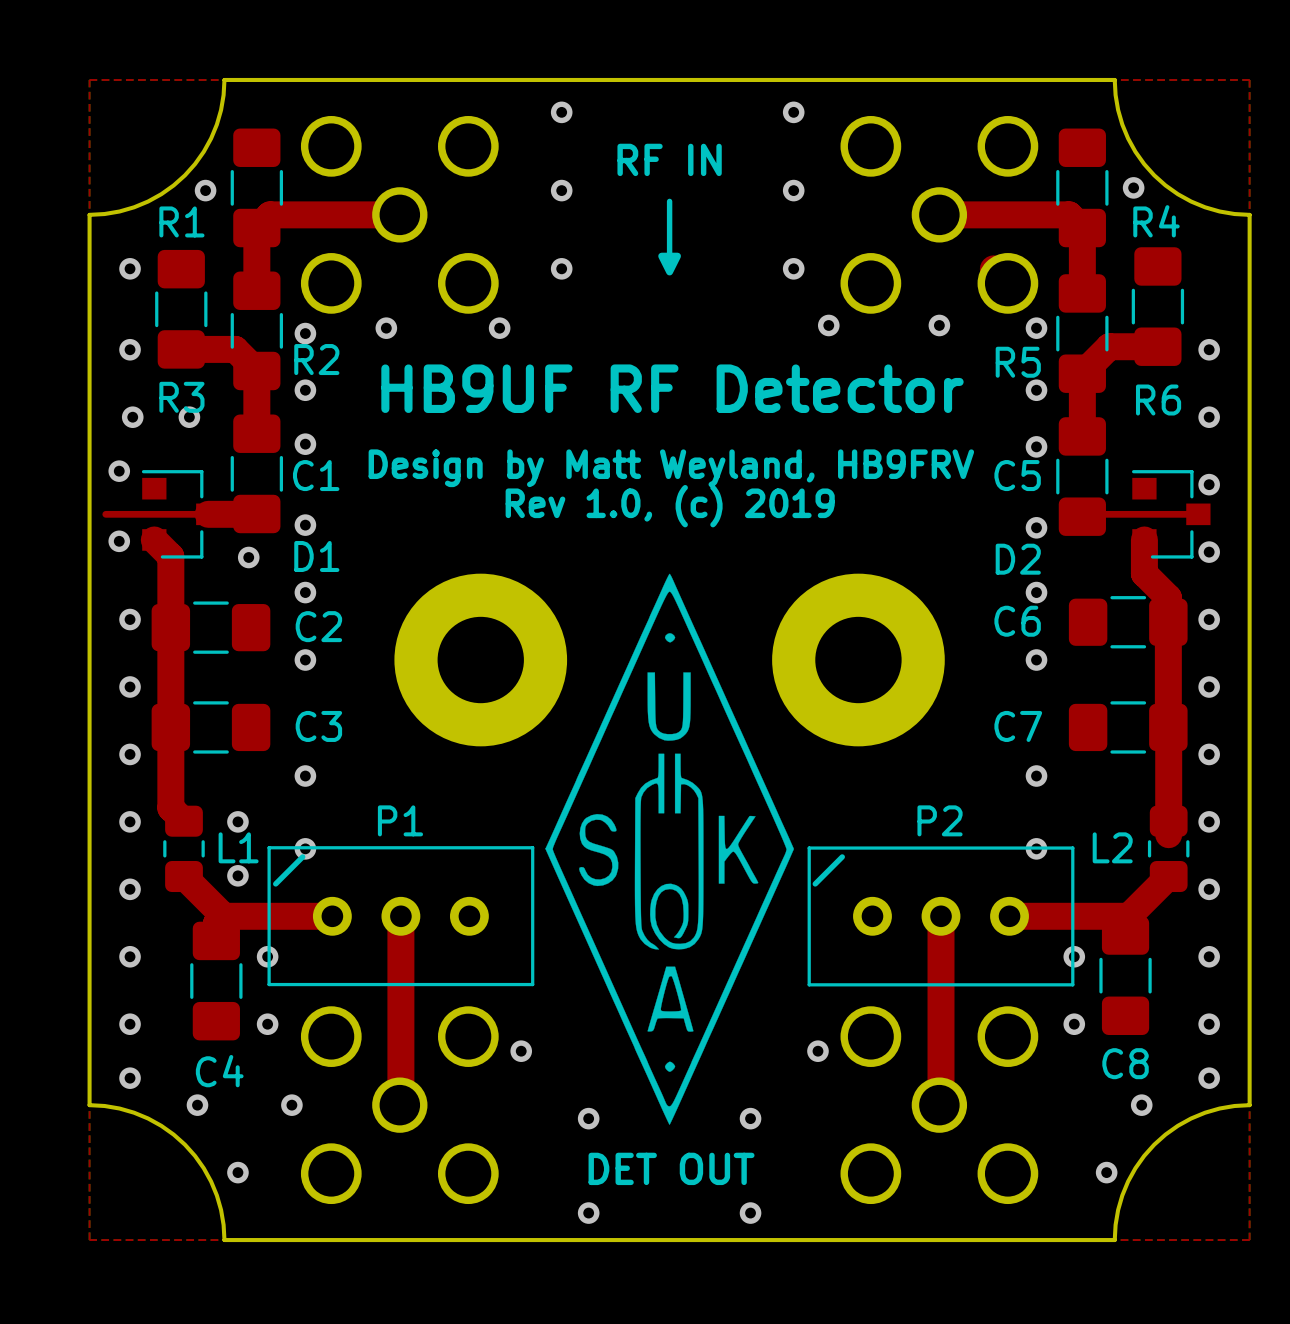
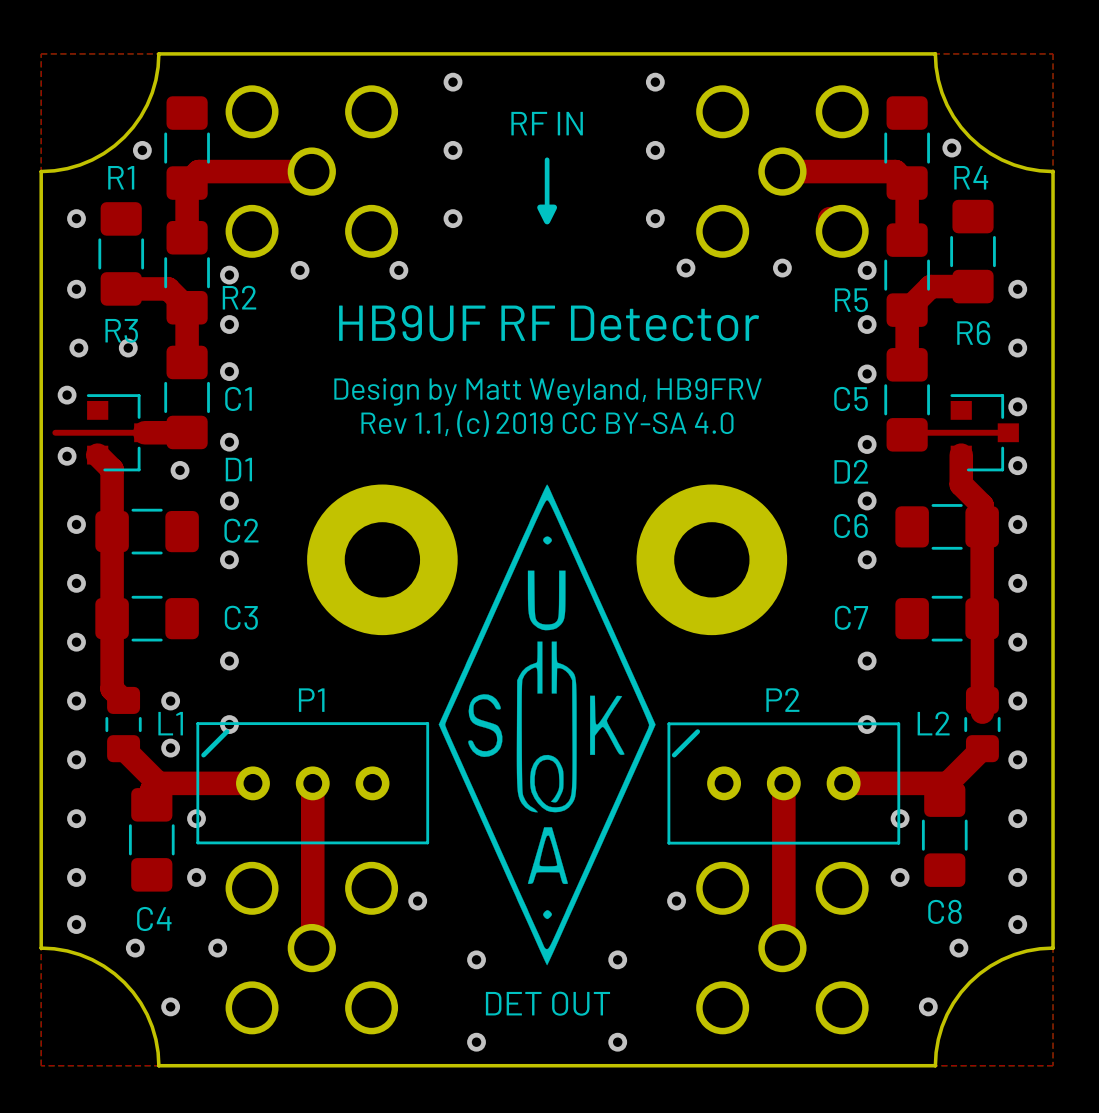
text: Rev 1.0, (c) 2019 (670, 506) -> Rev 1.1, (c) 2019 CC BY-SA 4.0 (547, 423)

